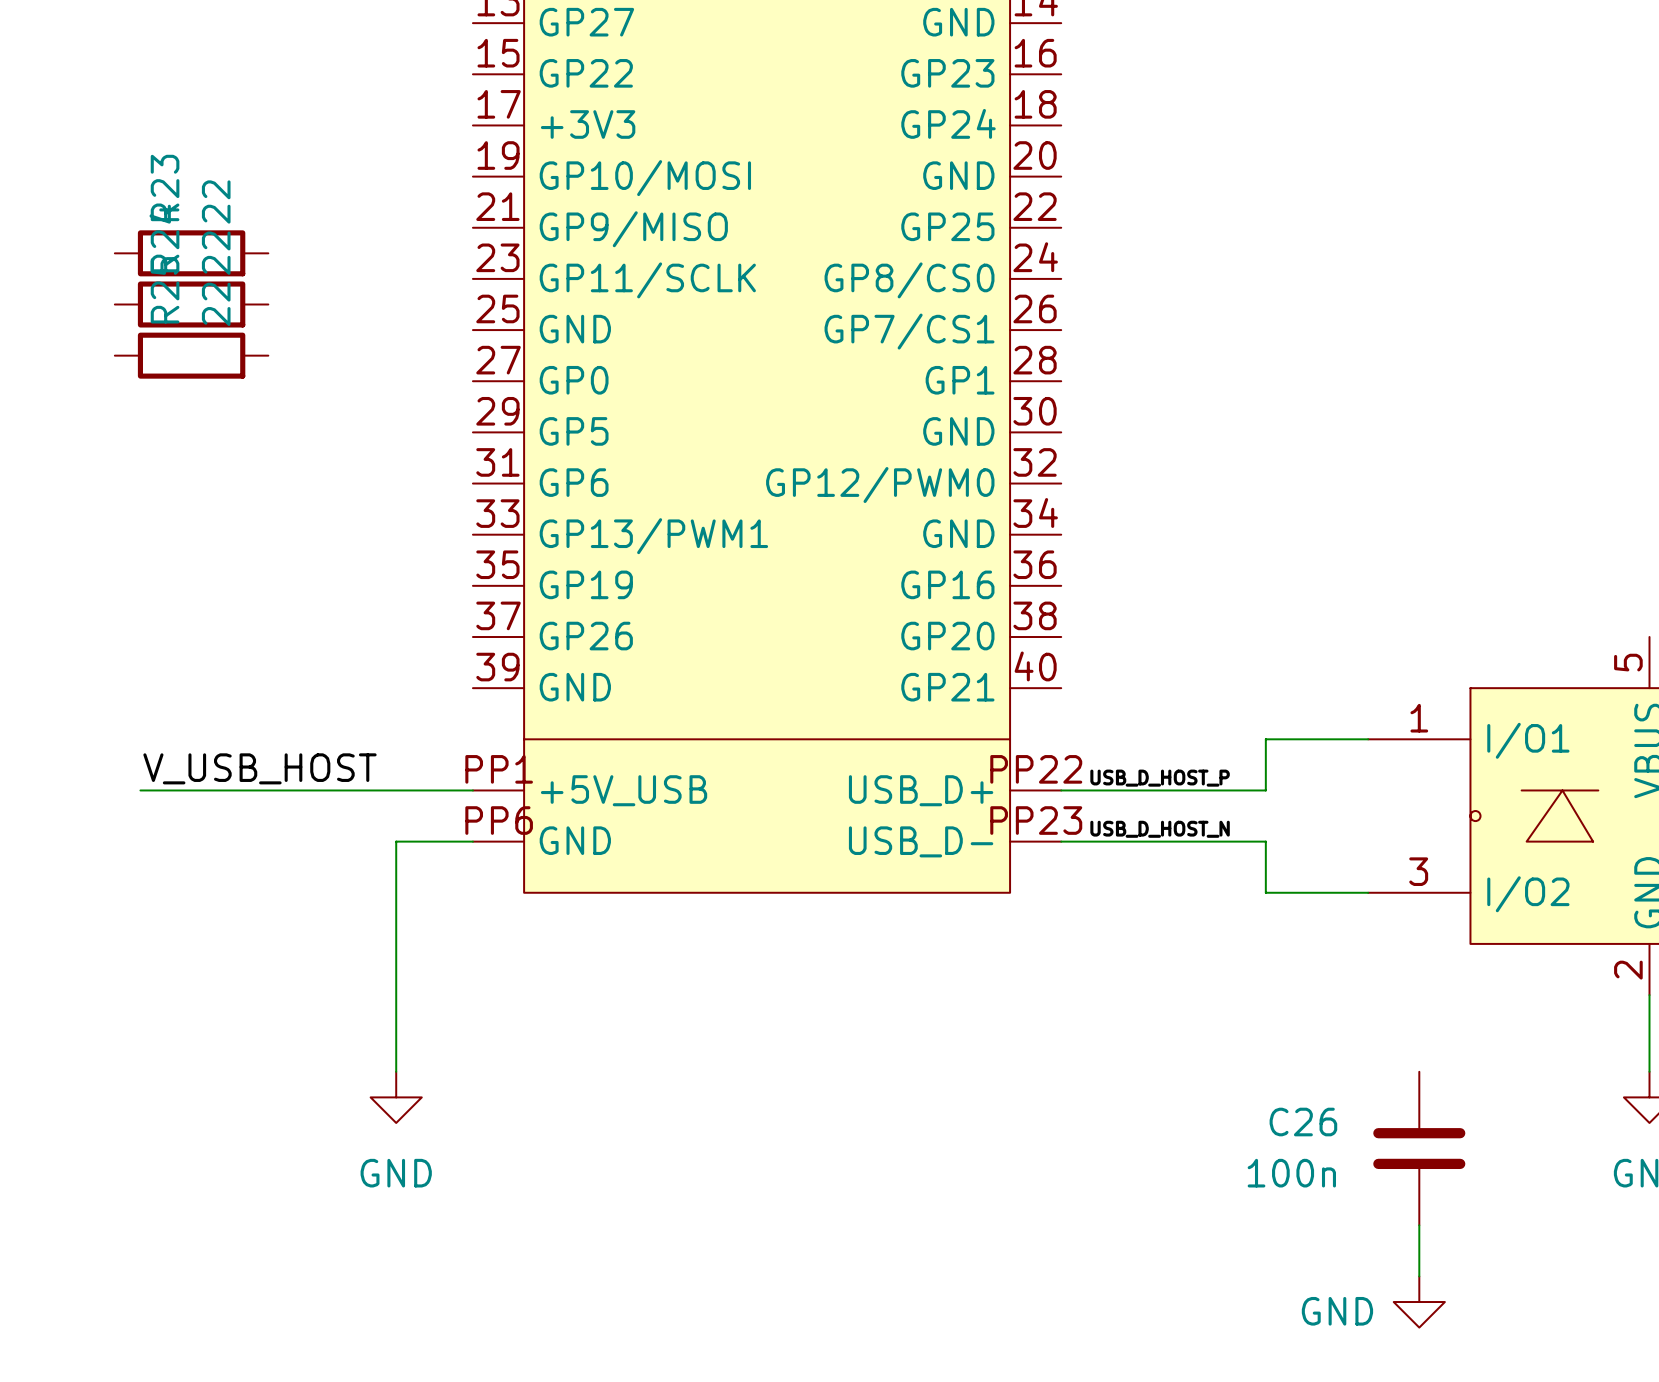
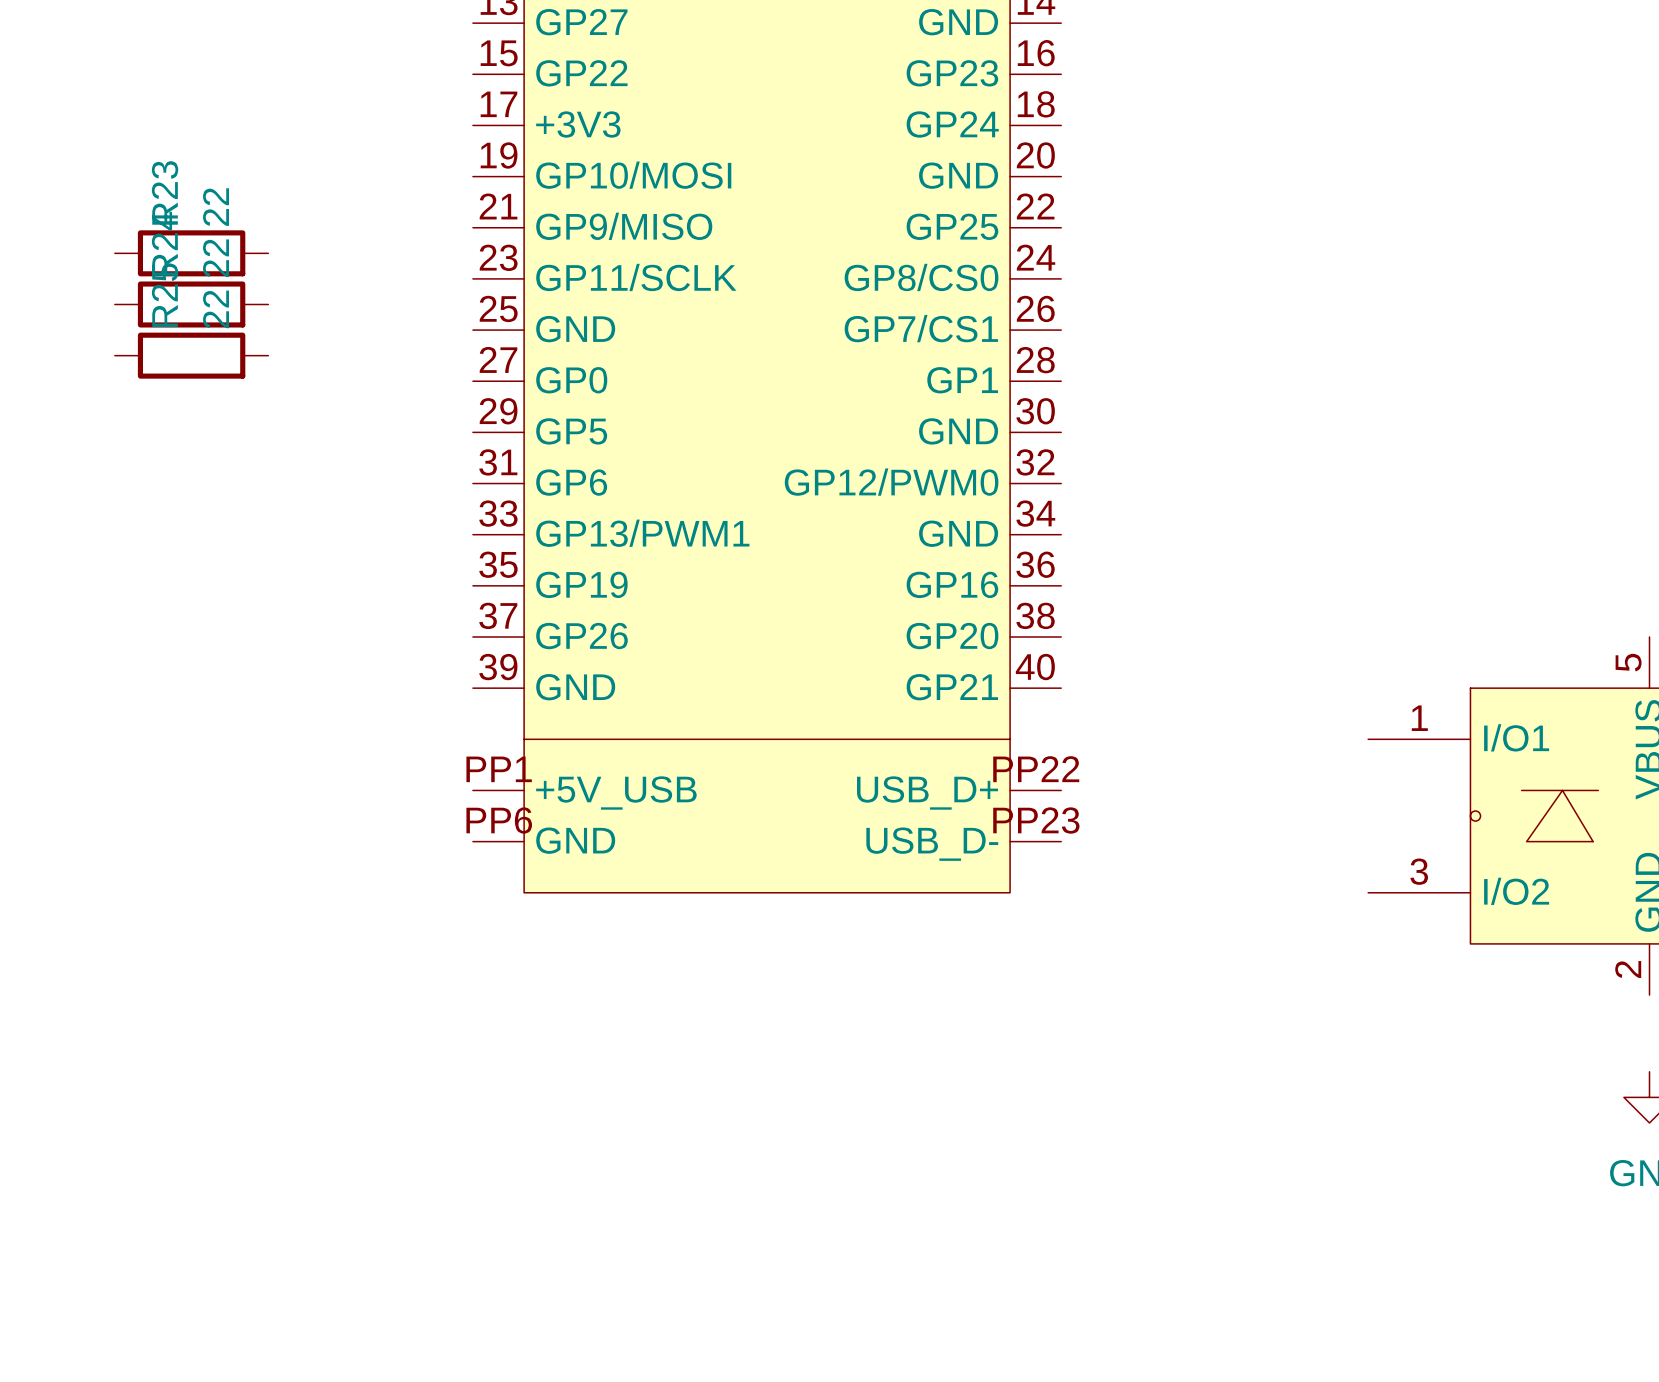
wire: (1368, 739) (1265, 739) (1265, 790) (1061, 790) -> none
label: V_USB_HOST (259, 768) -> none
label: USB_D_HOST_P (1160, 778) -> none
wire: (140, 790) (472, 790) -> none
label: USB_D_HOST_N (1160, 829) -> none
wire: (472, 841) (396, 841) (396, 1071) -> none
wire: (1061, 841) (1265, 841) (1265, 892) (1368, 892) -> none
wire: (1649, 995) (1649, 1071) -> none
power symbol: GND (396, 1097) -> none
C26: 100n (1419, 1148) -> none
wire: (1419, 1225) (1419, 1276) -> none
power symbol: GND (1419, 1302) -> none

